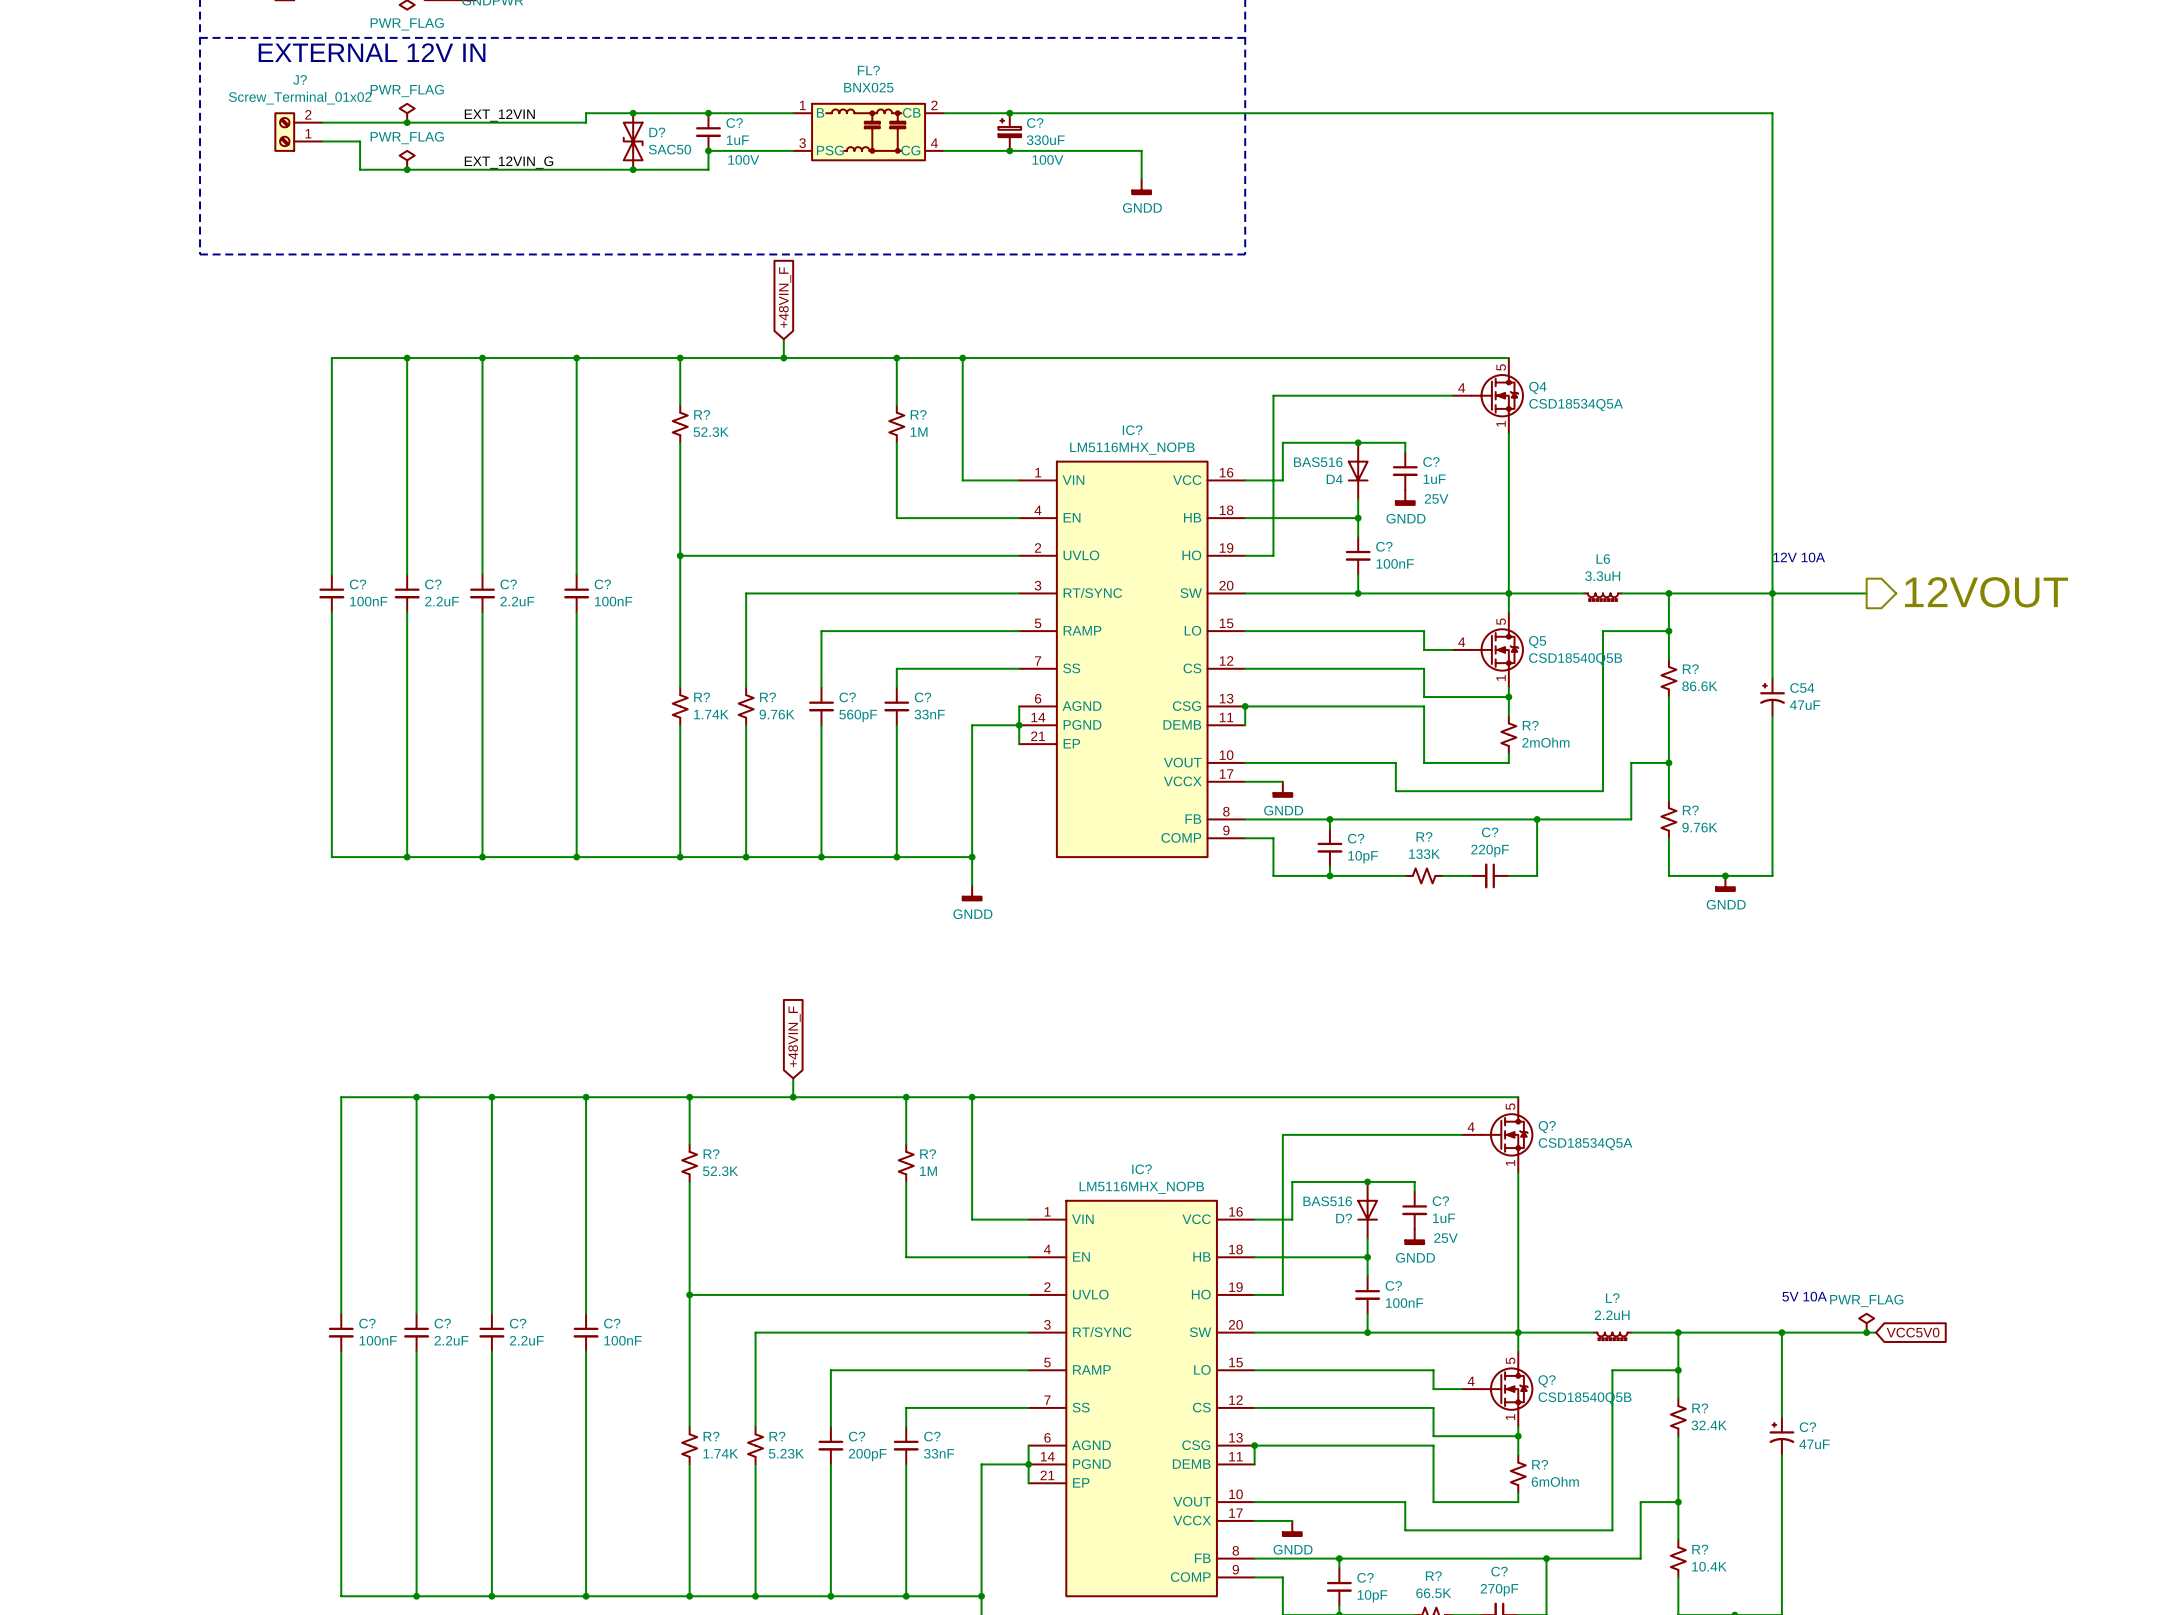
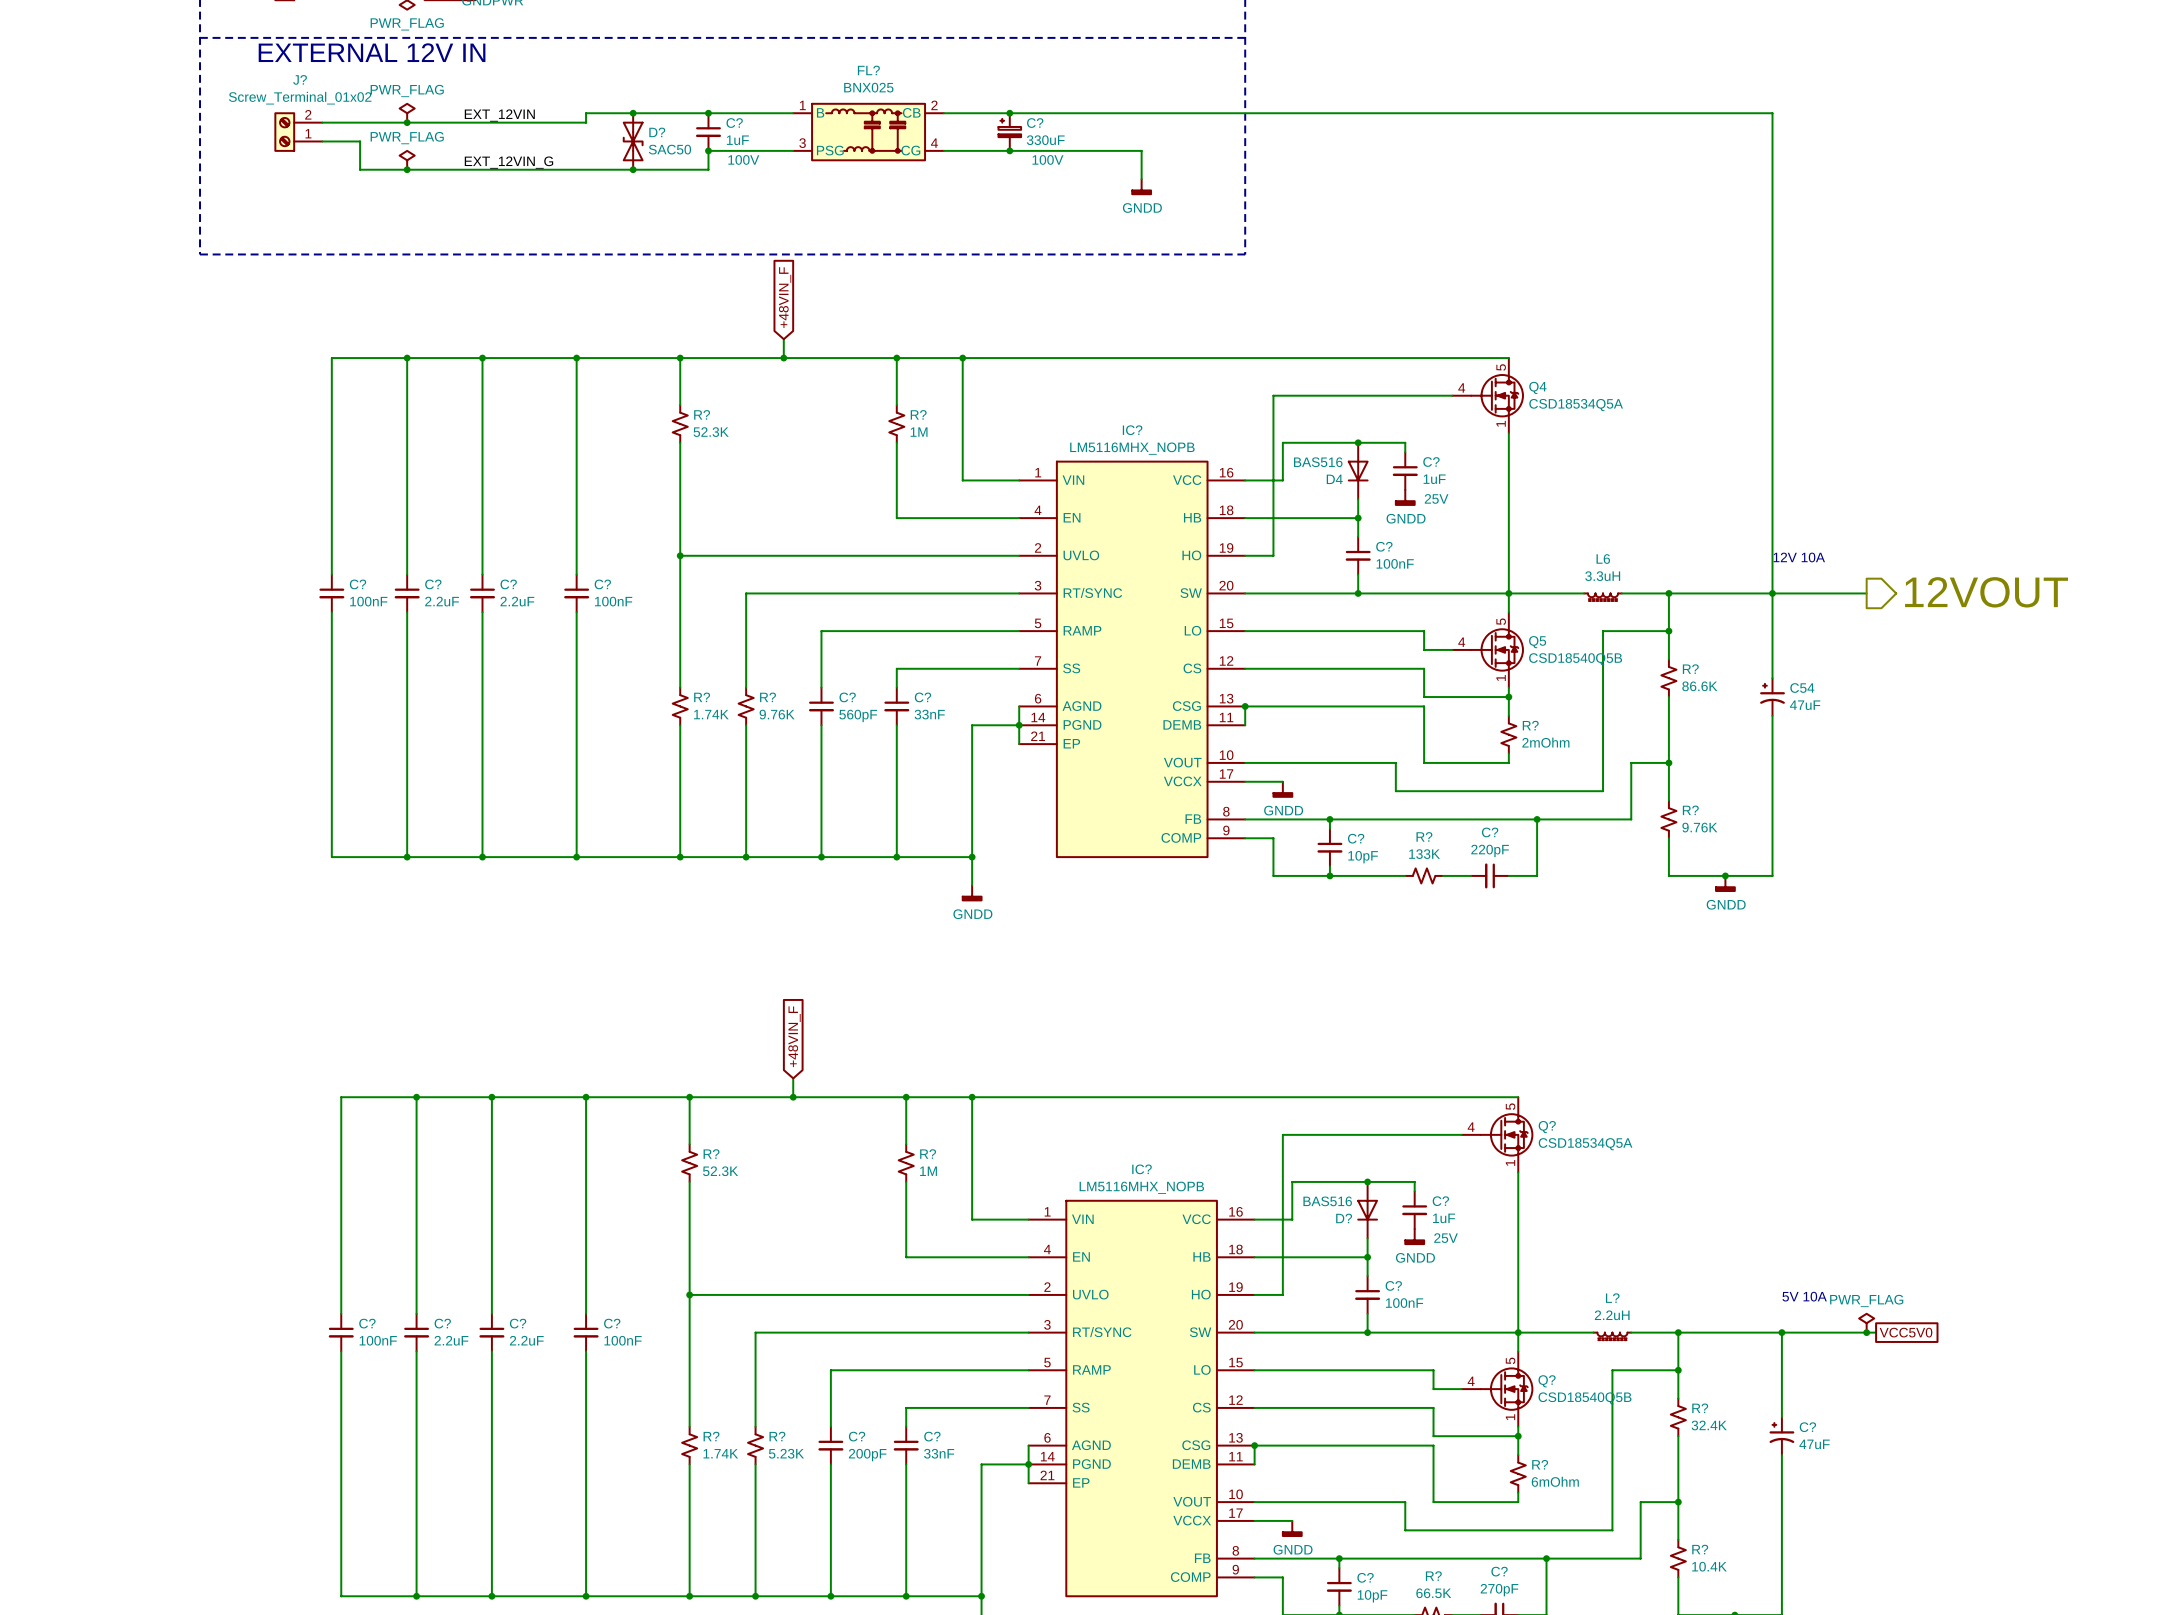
global label shape: input (1913, 1332) -> passive (1905, 1332)

